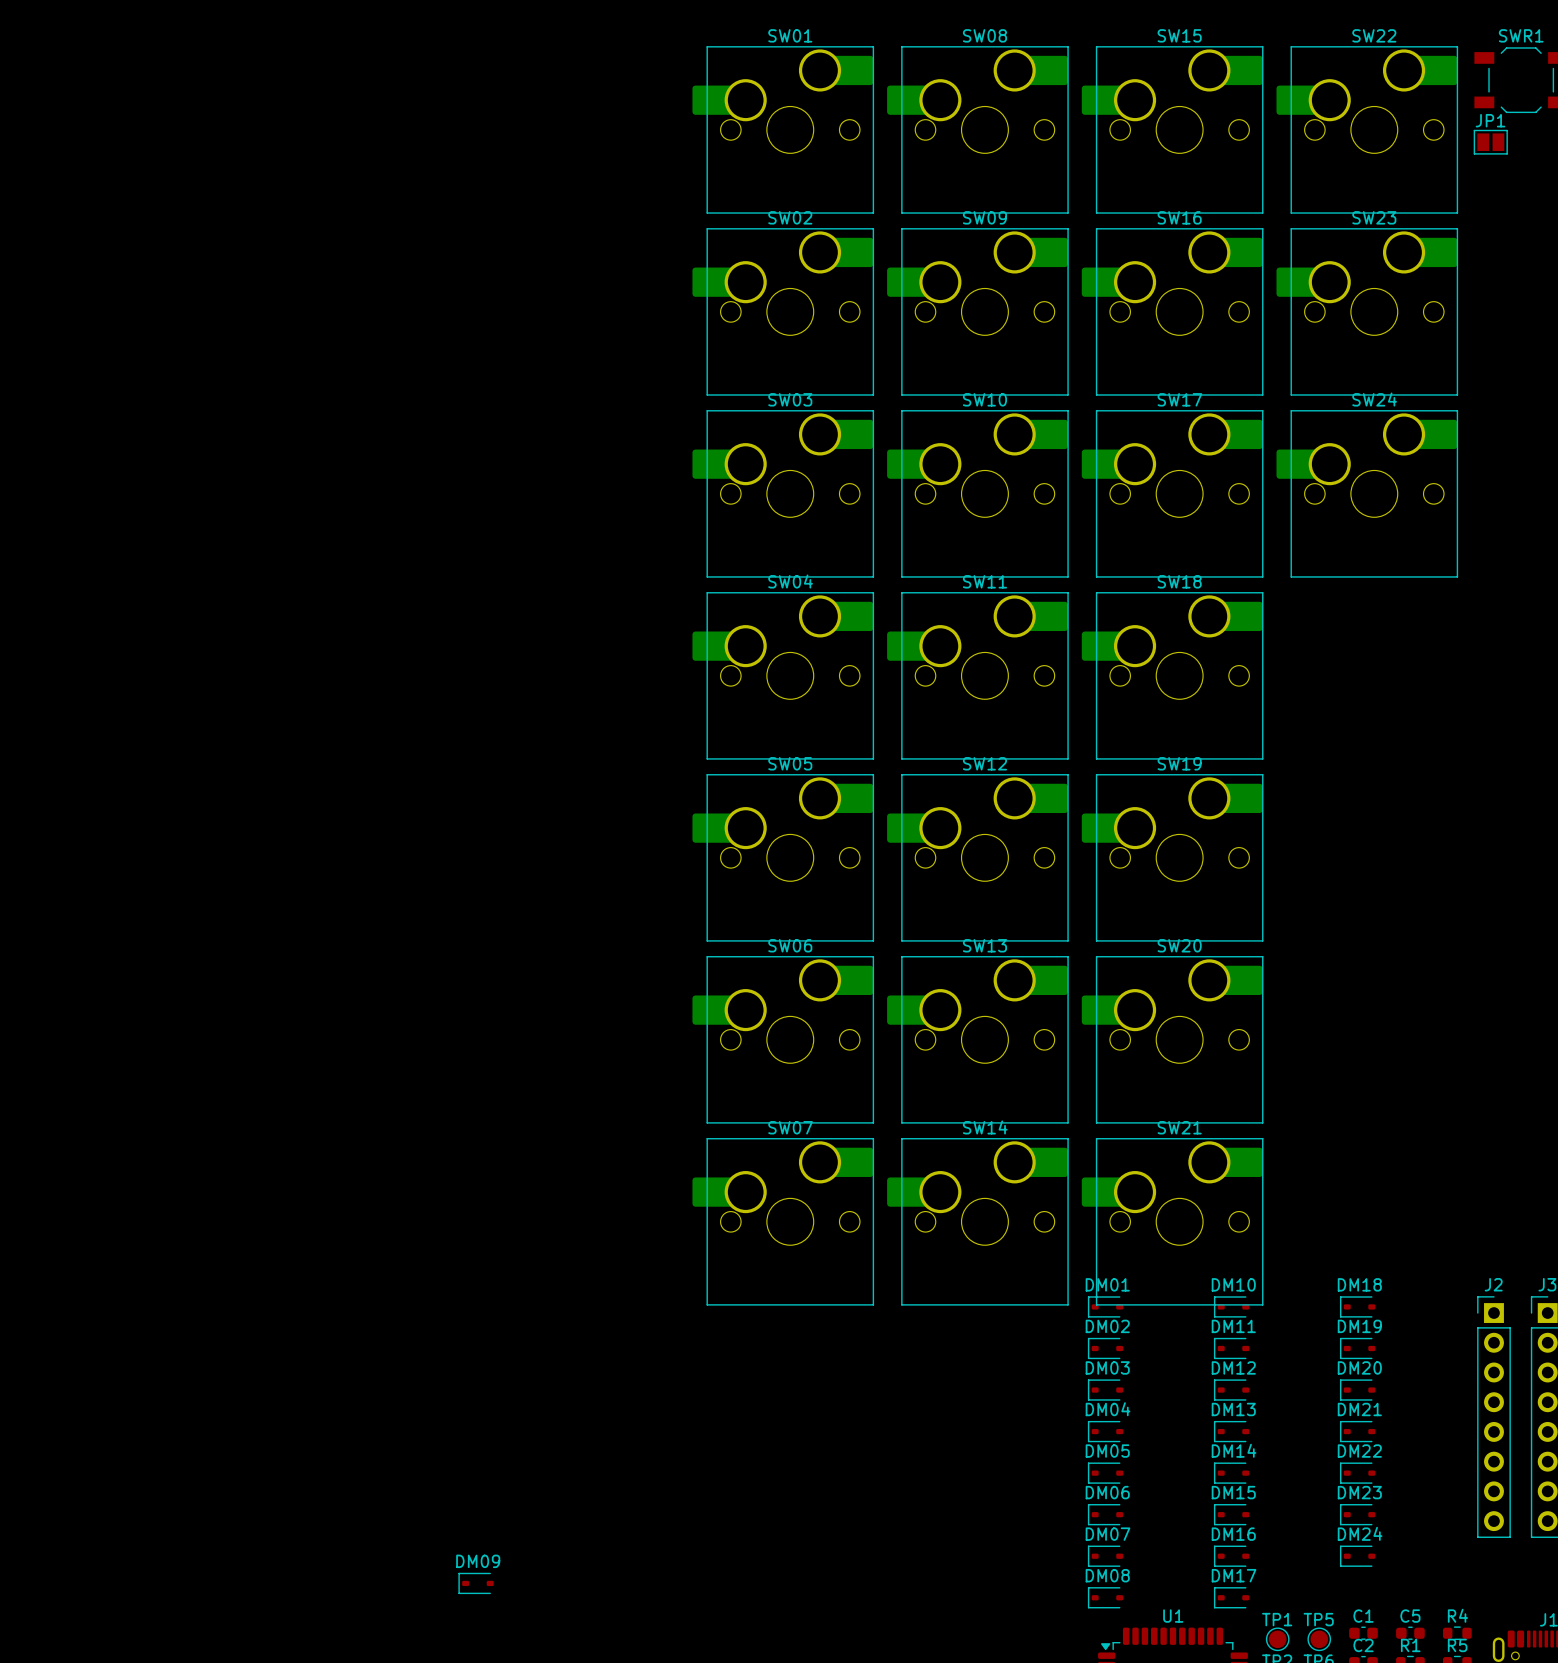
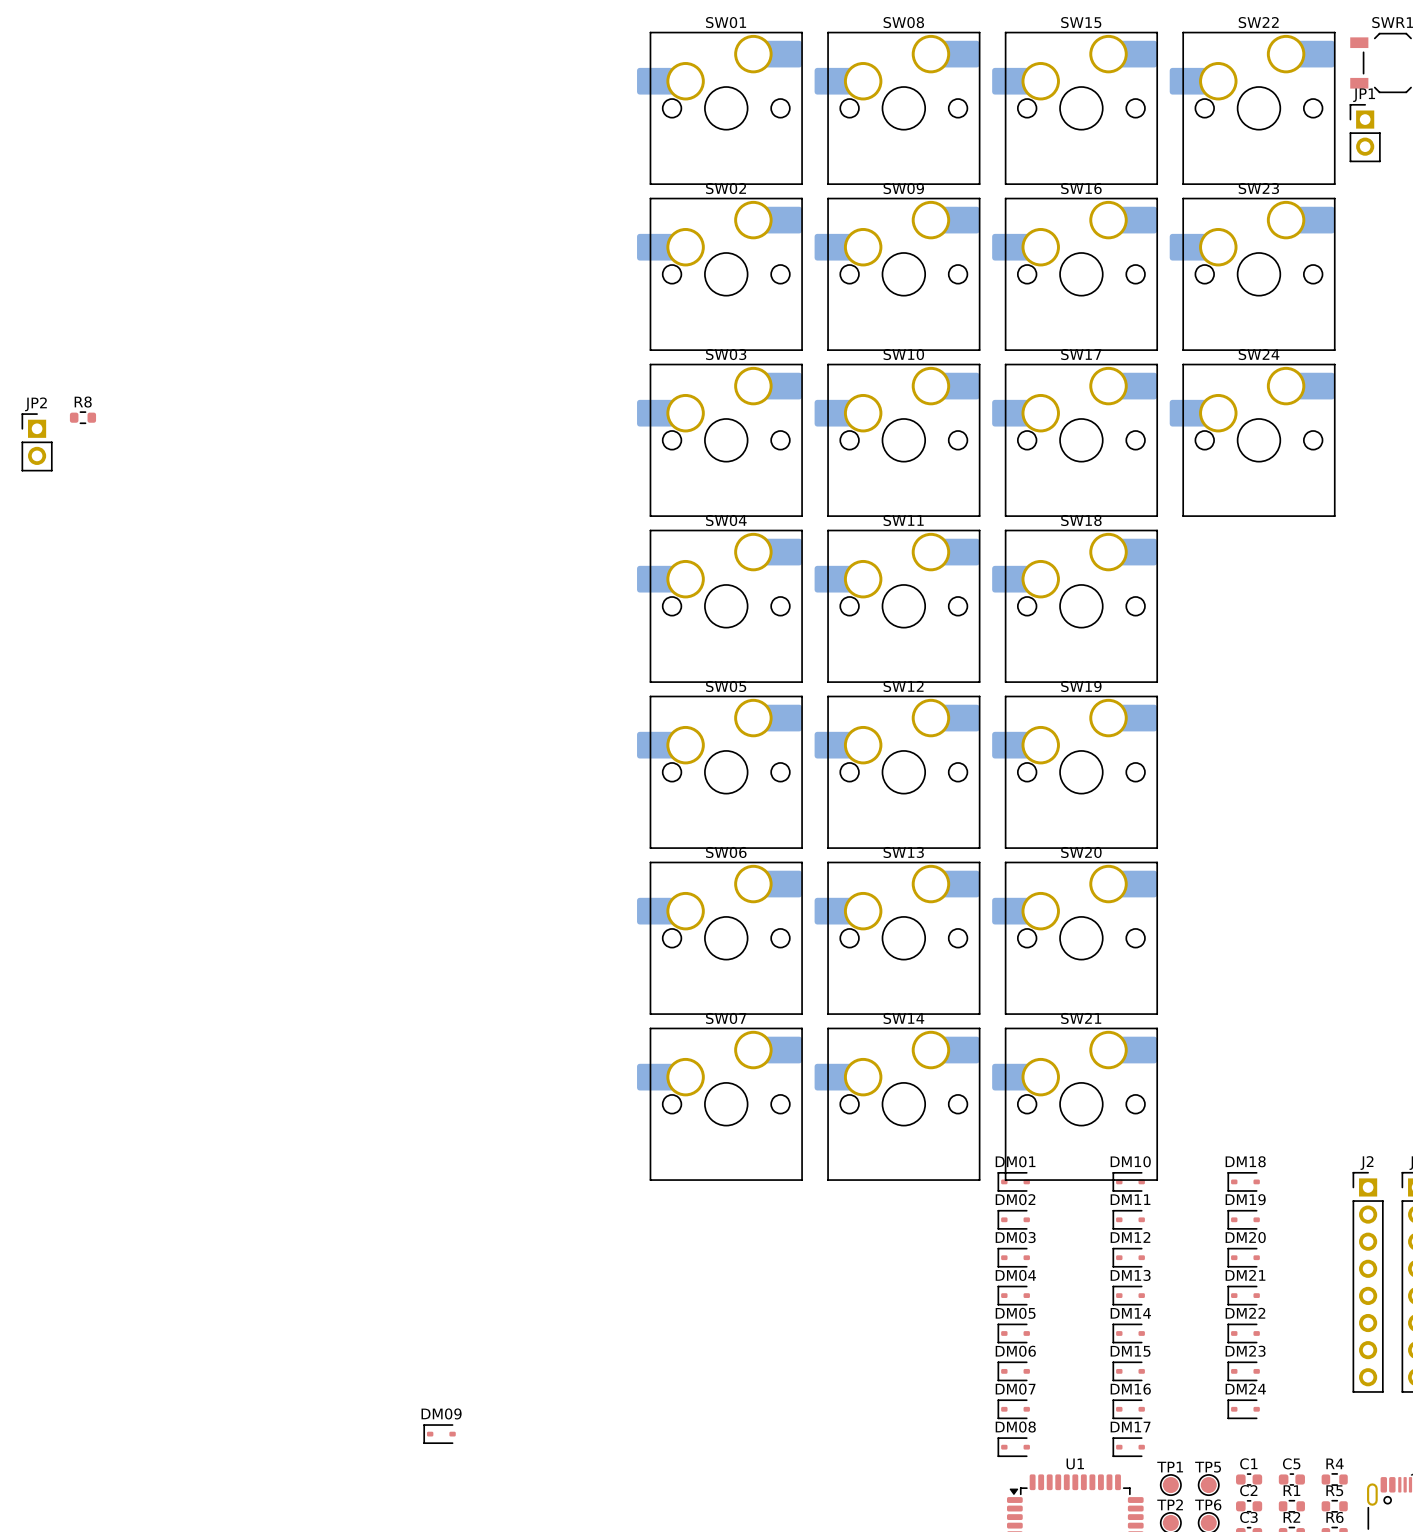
JP1 footprint: [1473, 129, 1508, 155] -> [1349, 104, 1381, 163]
R8: none -> (82, 417)
JP2: none -> (37, 442)

